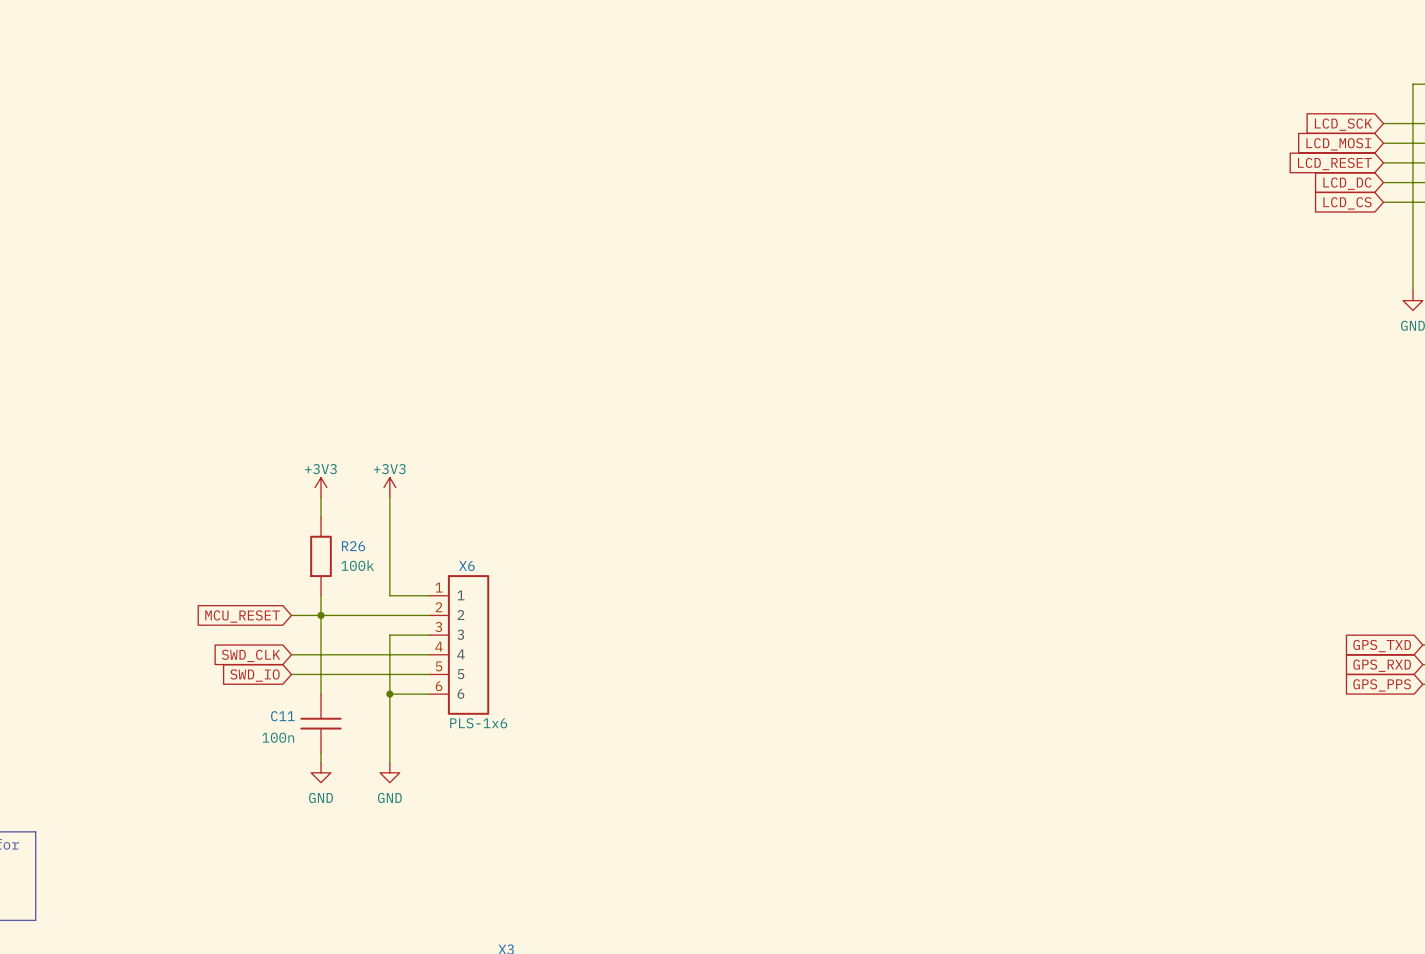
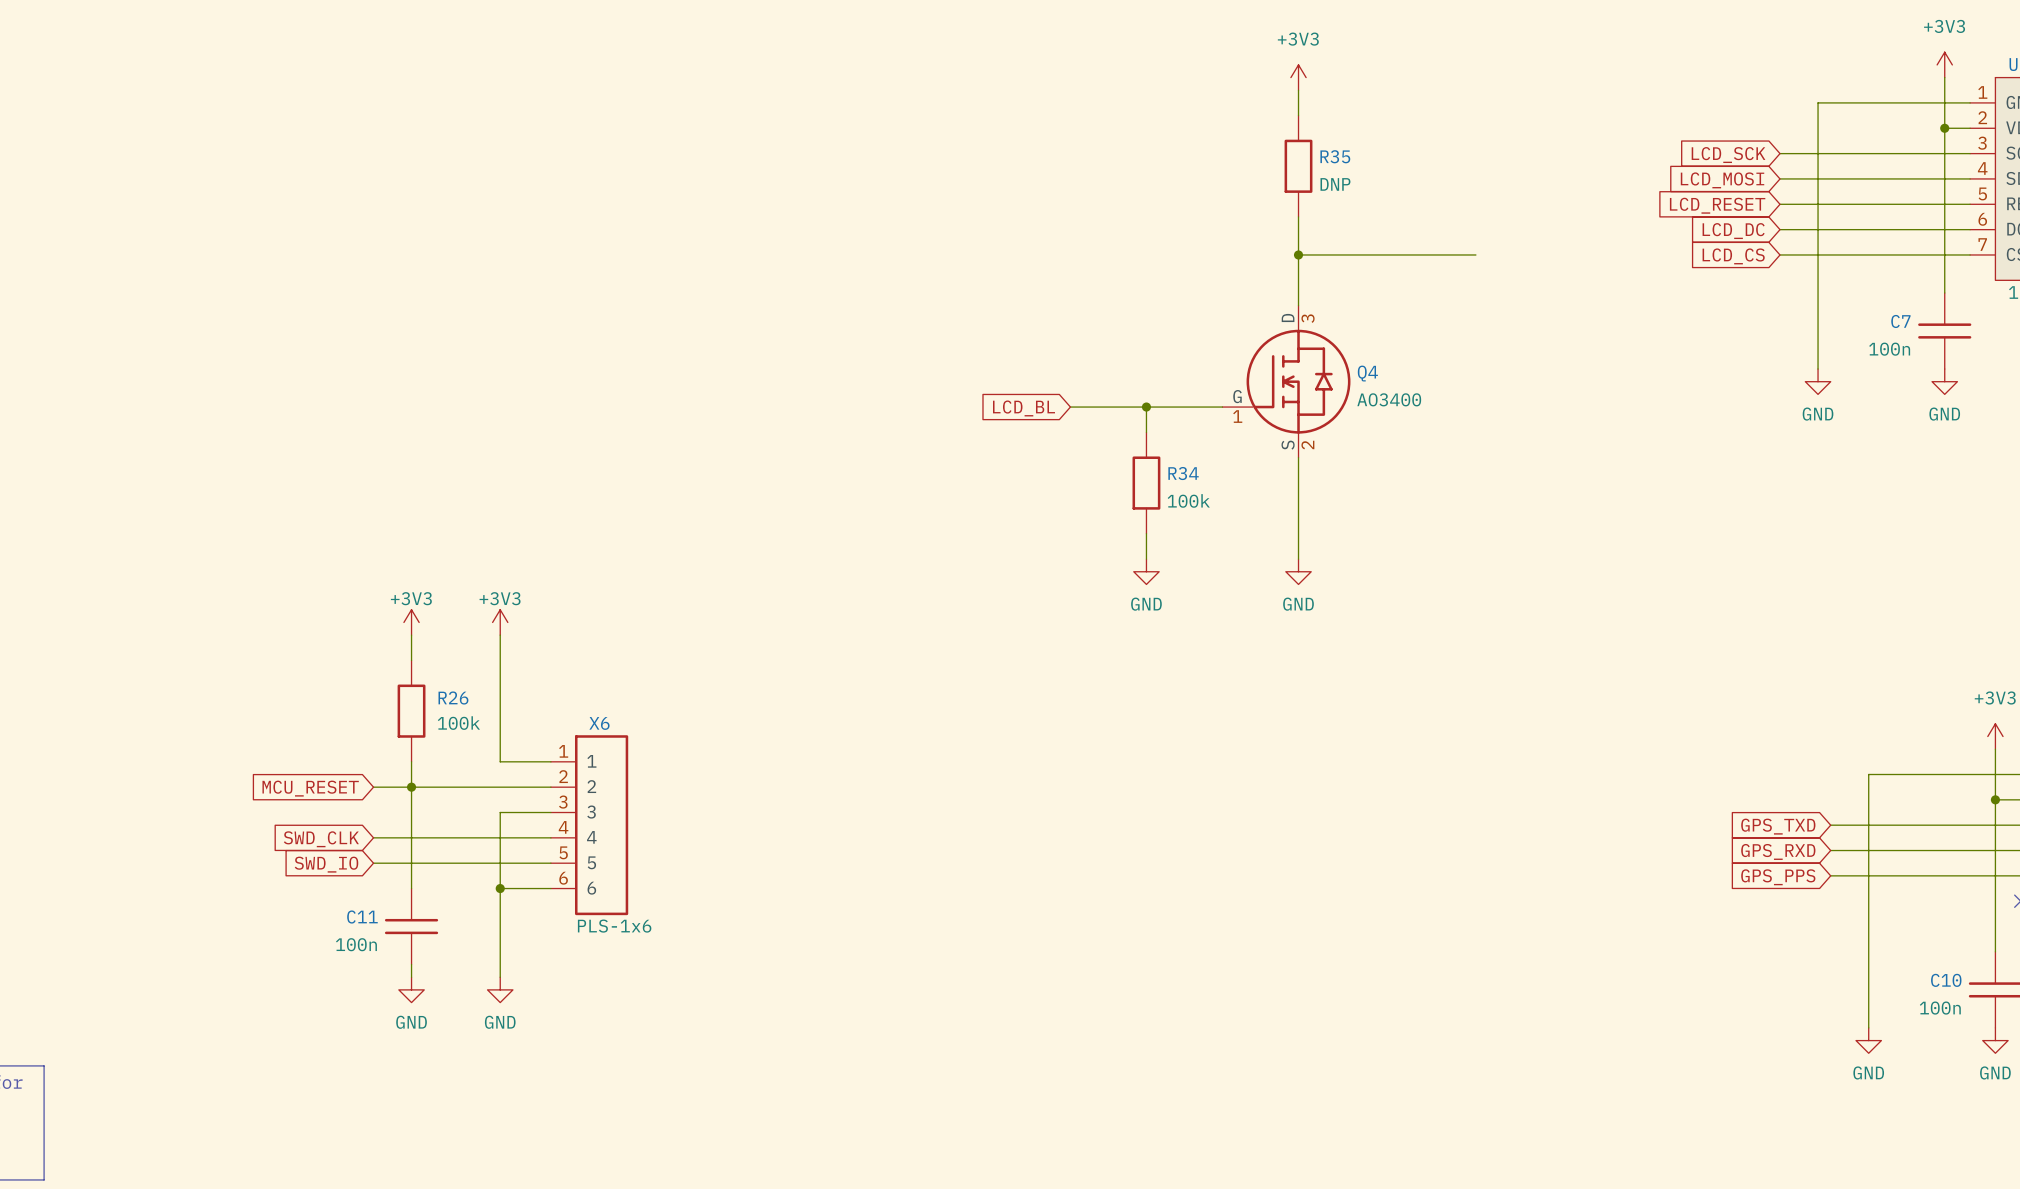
power symbol: none -> +3V3 (1298, 77)
wire: none -> (1298, 90) (1298, 115)
R35: none -> DNP (1298, 166)
wire: none -> (1298, 216) (1298, 305)
wire: none -> (1298, 254) (1475, 254)
junction: none -> (1298, 254)
Q4: none -> AO3400 (1286, 381)
wire: none -> (1070, 407) (1222, 407)
wire: none -> (1146, 407) (1146, 432)
junction: none -> (1146, 407)
global label: none -> LCD_BL (1024, 408)
wire: none -> (1298, 457) (1298, 559)
R34: none -> 100k (1146, 483)
wire: none -> (1146, 533) (1146, 559)
power symbol: none -> GND (1146, 571)
power symbol: none -> GND (1298, 571)

